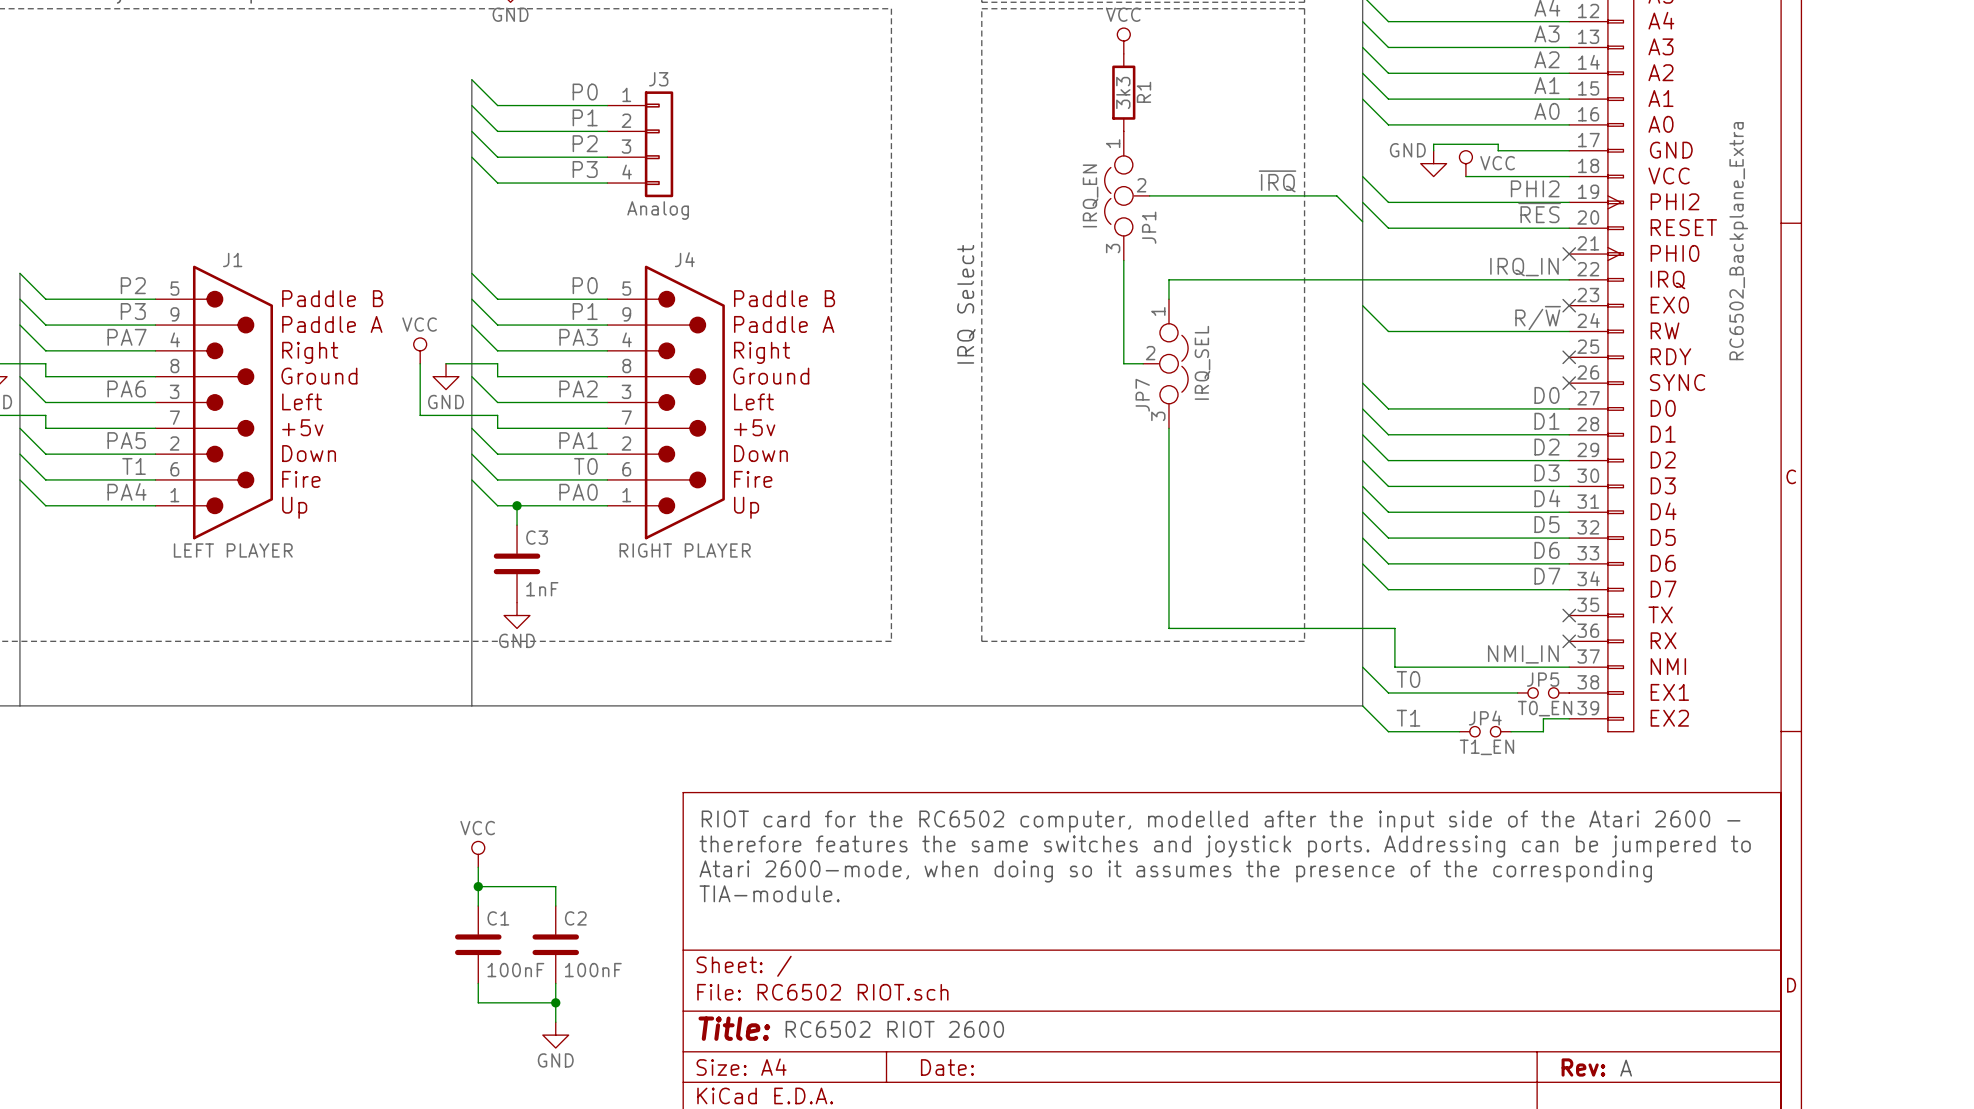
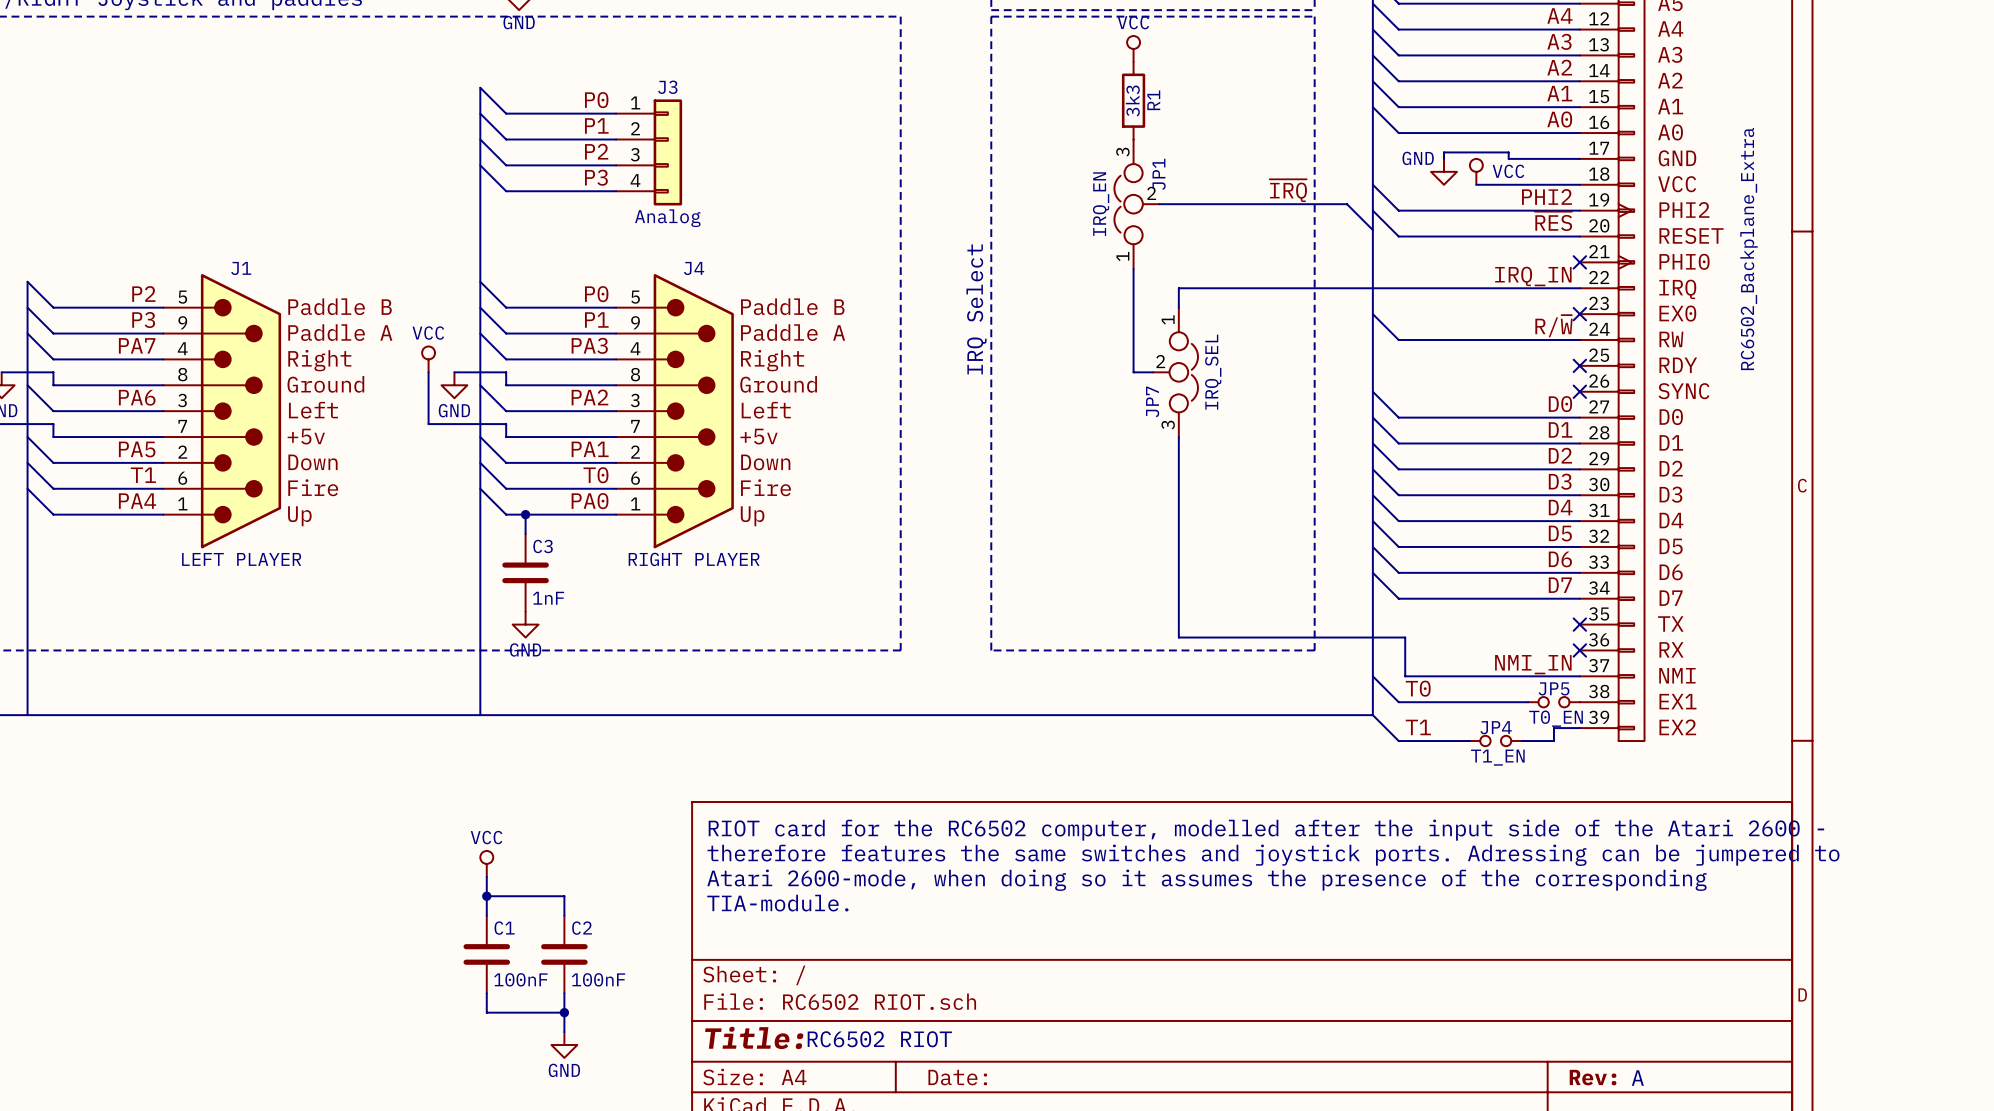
JP1 flip: as is (1118, 195) -> up-down (1128, 204)
text: therefore features the same switches and joystick ports. Addressing can be jumpered to (1225, 846) -> therefore features the same switches and joystick ports. Adressing can be jumpered to (1273, 855)
text: RC6502 RIOT 2600 (894, 1029) -> RC6502 RIOT (879, 1039)

